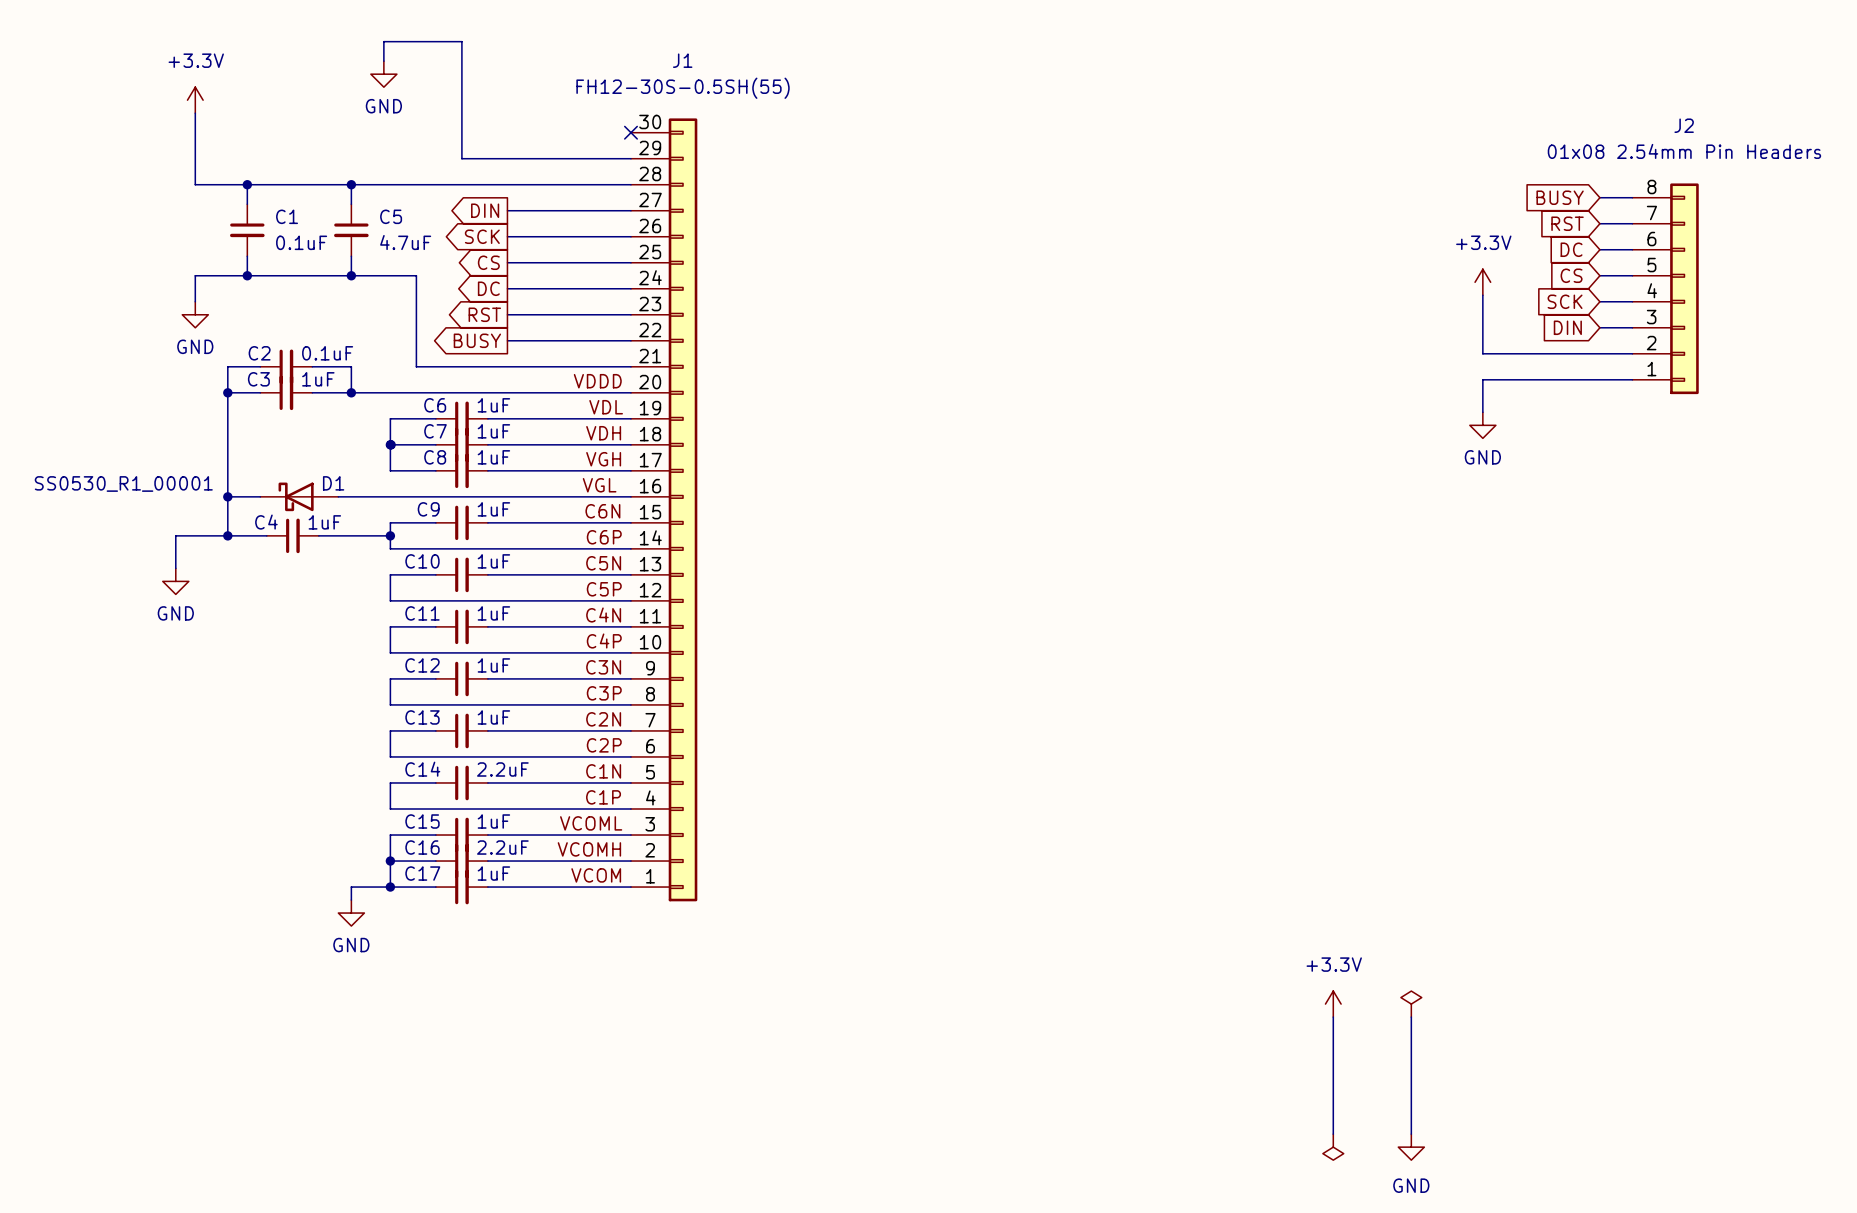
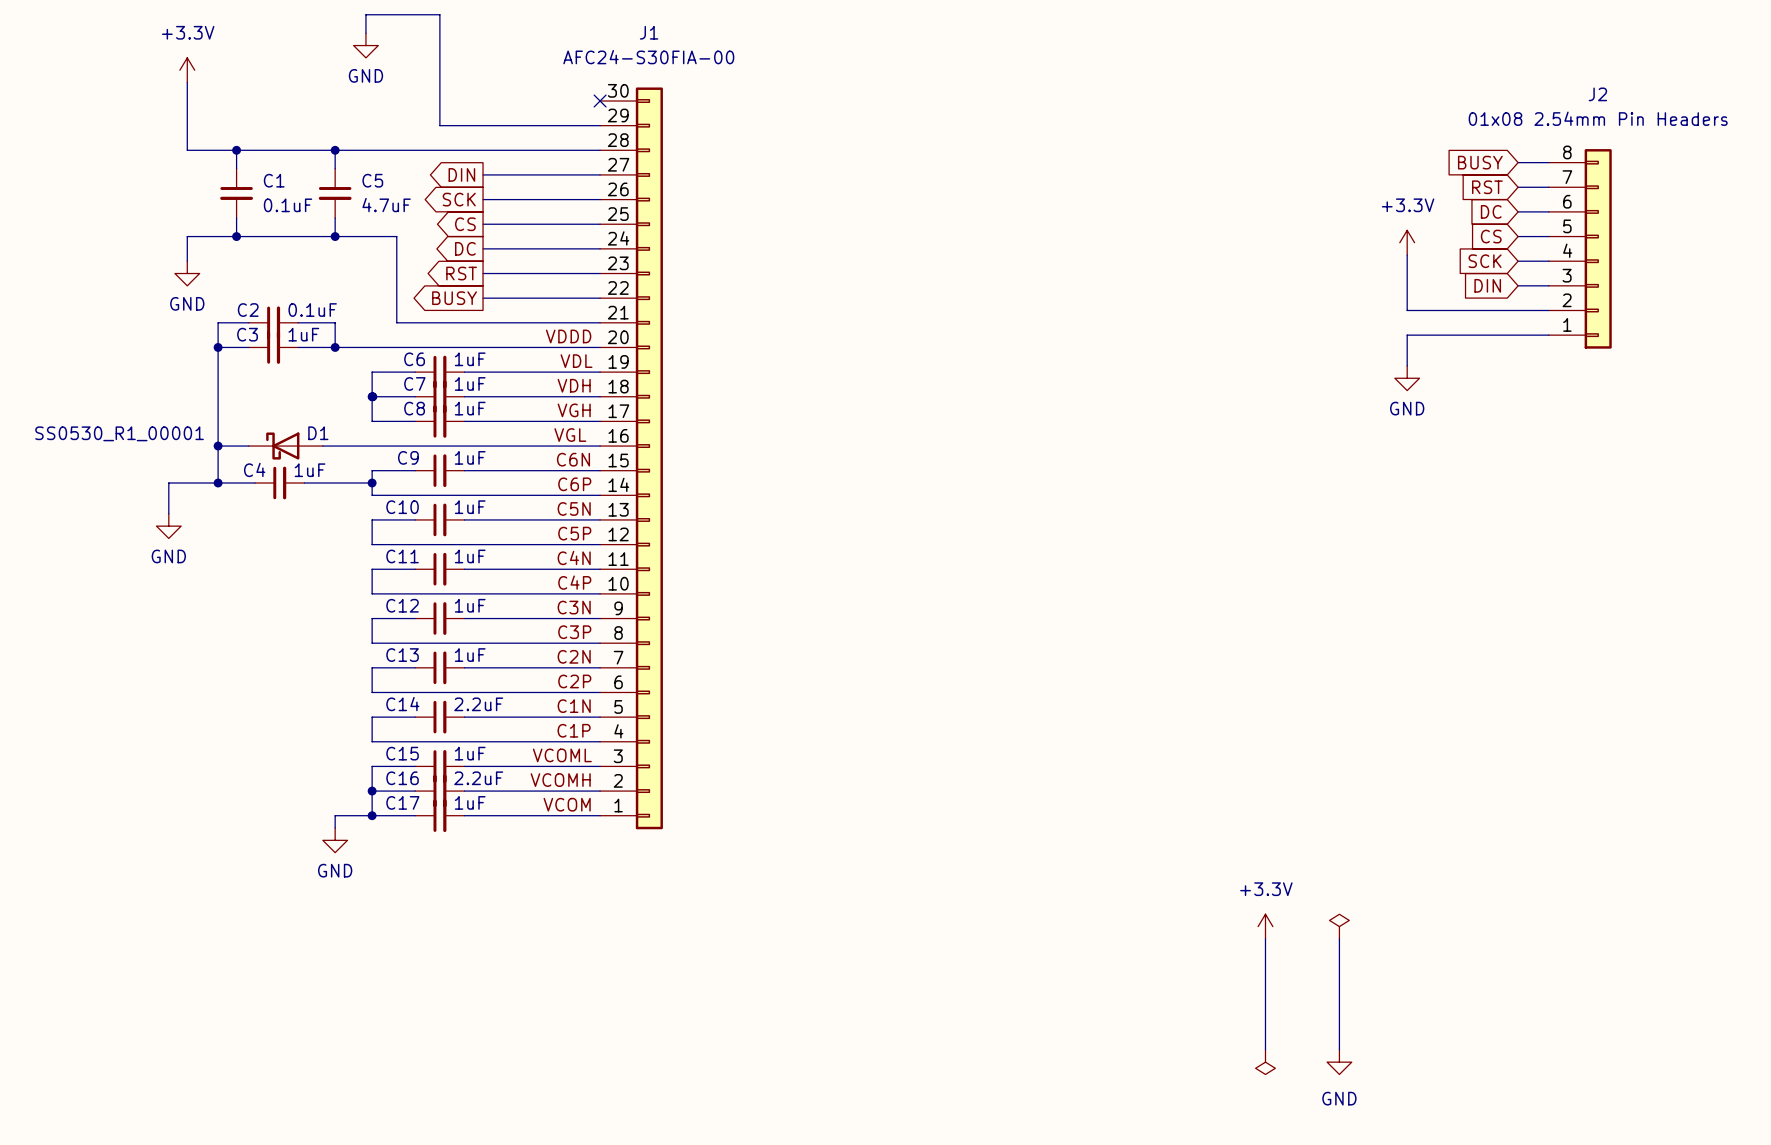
J1 value: FH12-30S-0.5SH(55) (683, 88) -> AFC24-S30FIA-00 (648, 57)

